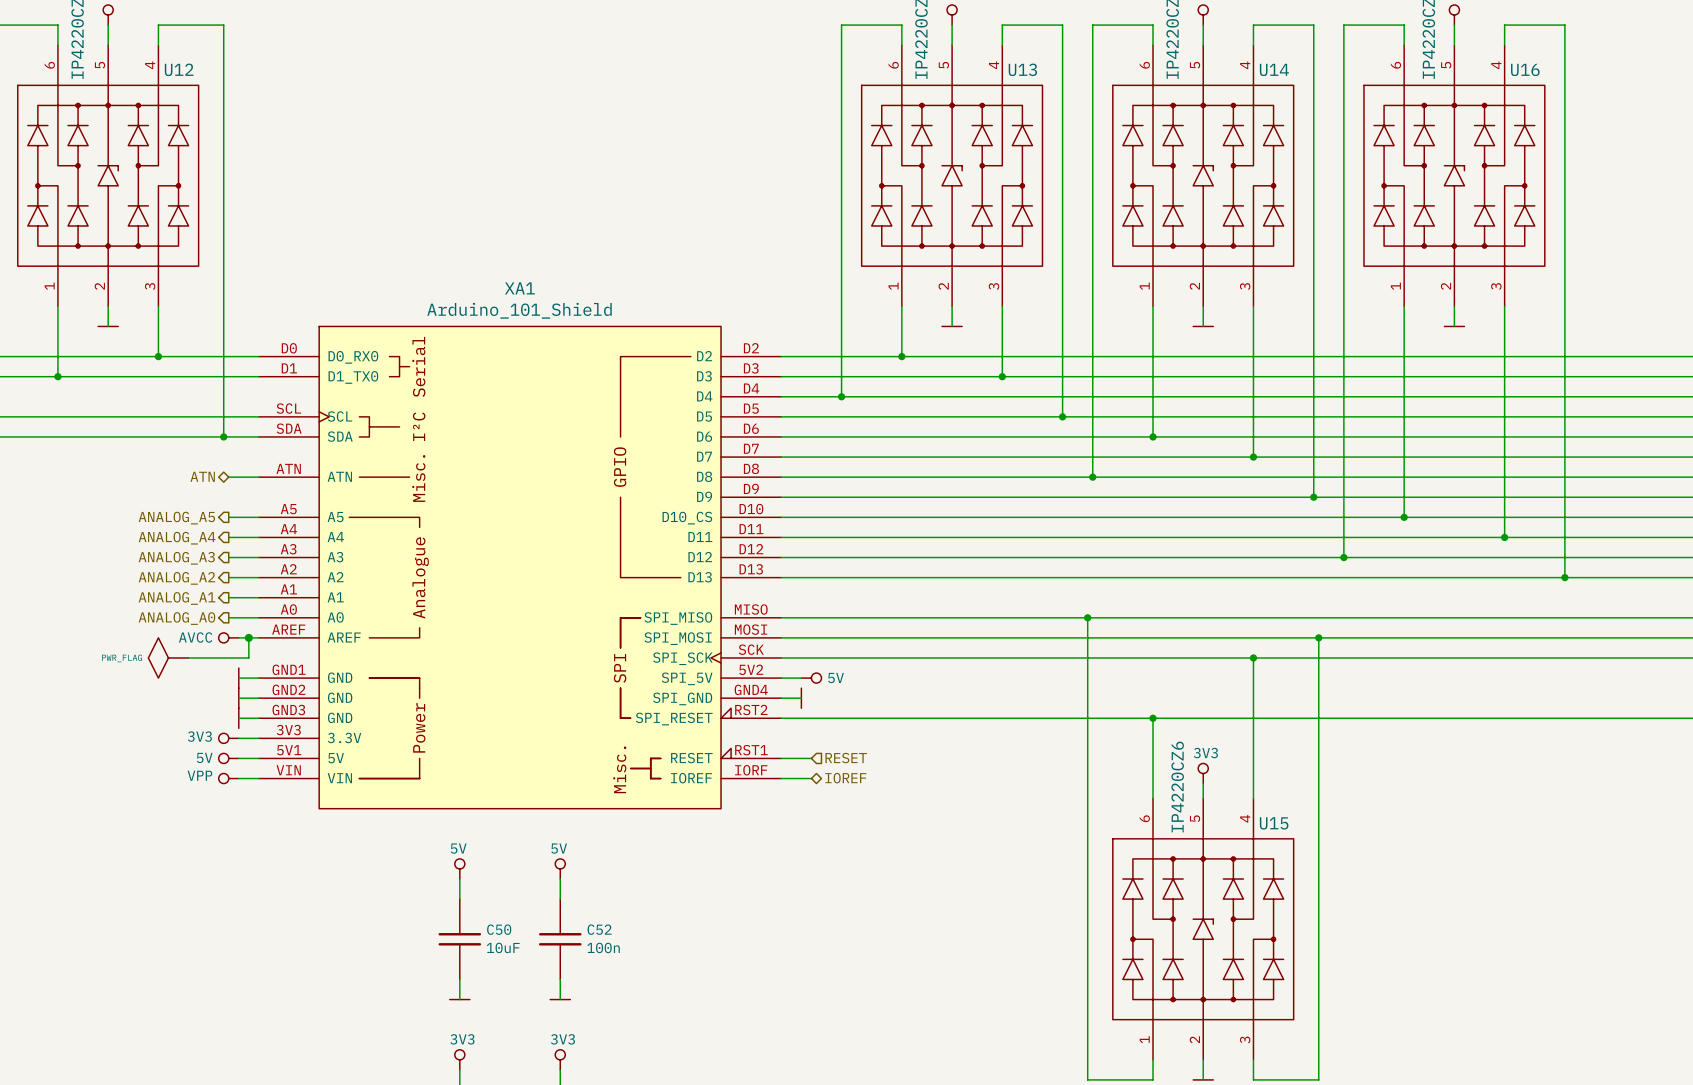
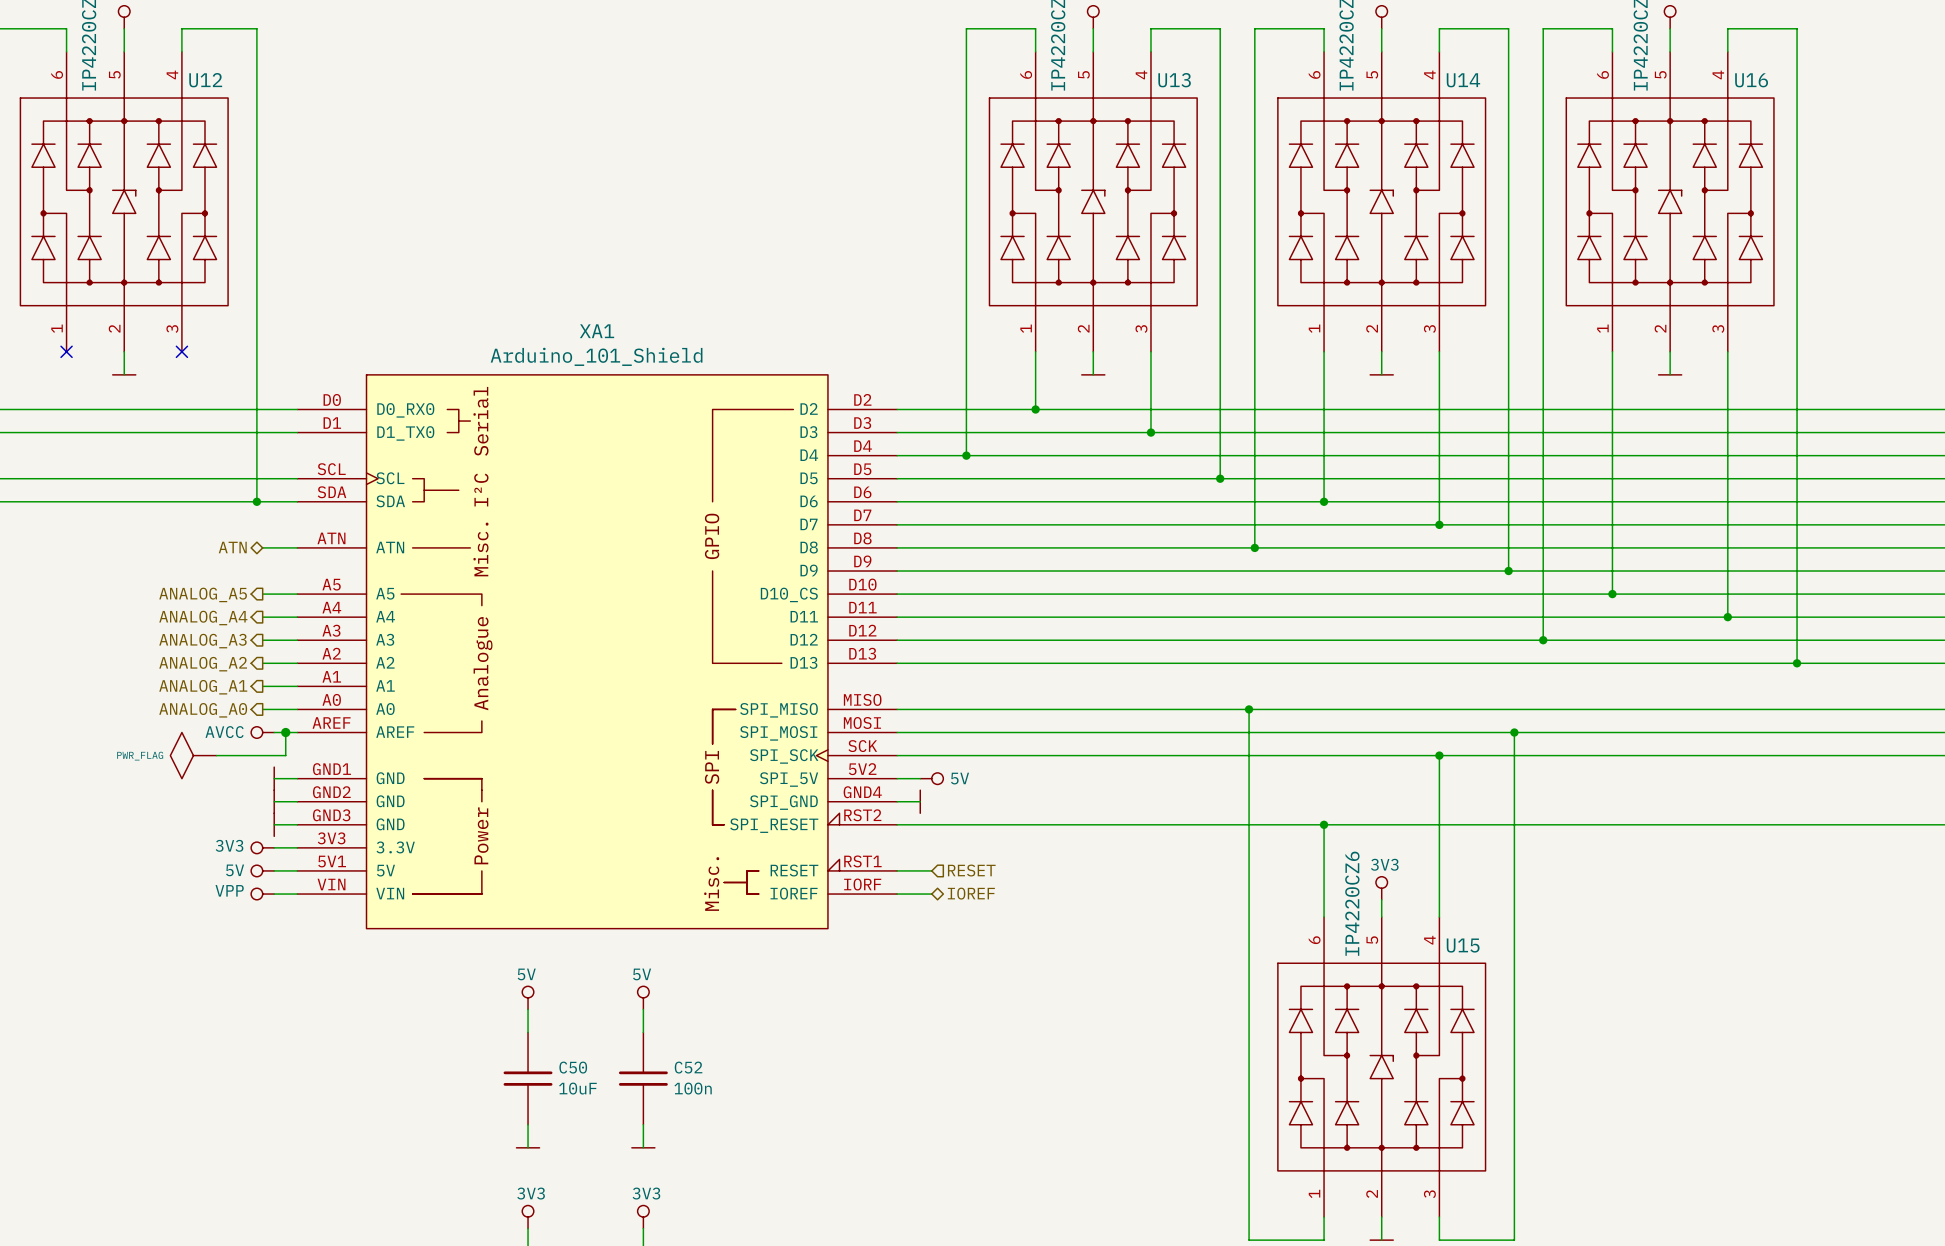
wire: (57, 306) (57, 376) -> none
no-connect mark: none -> (66, 351)
wire: (158, 306) (158, 356) -> none
no-connect mark: none -> (181, 351)
junction: (158, 356) -> none
junction: (57, 376) -> none

